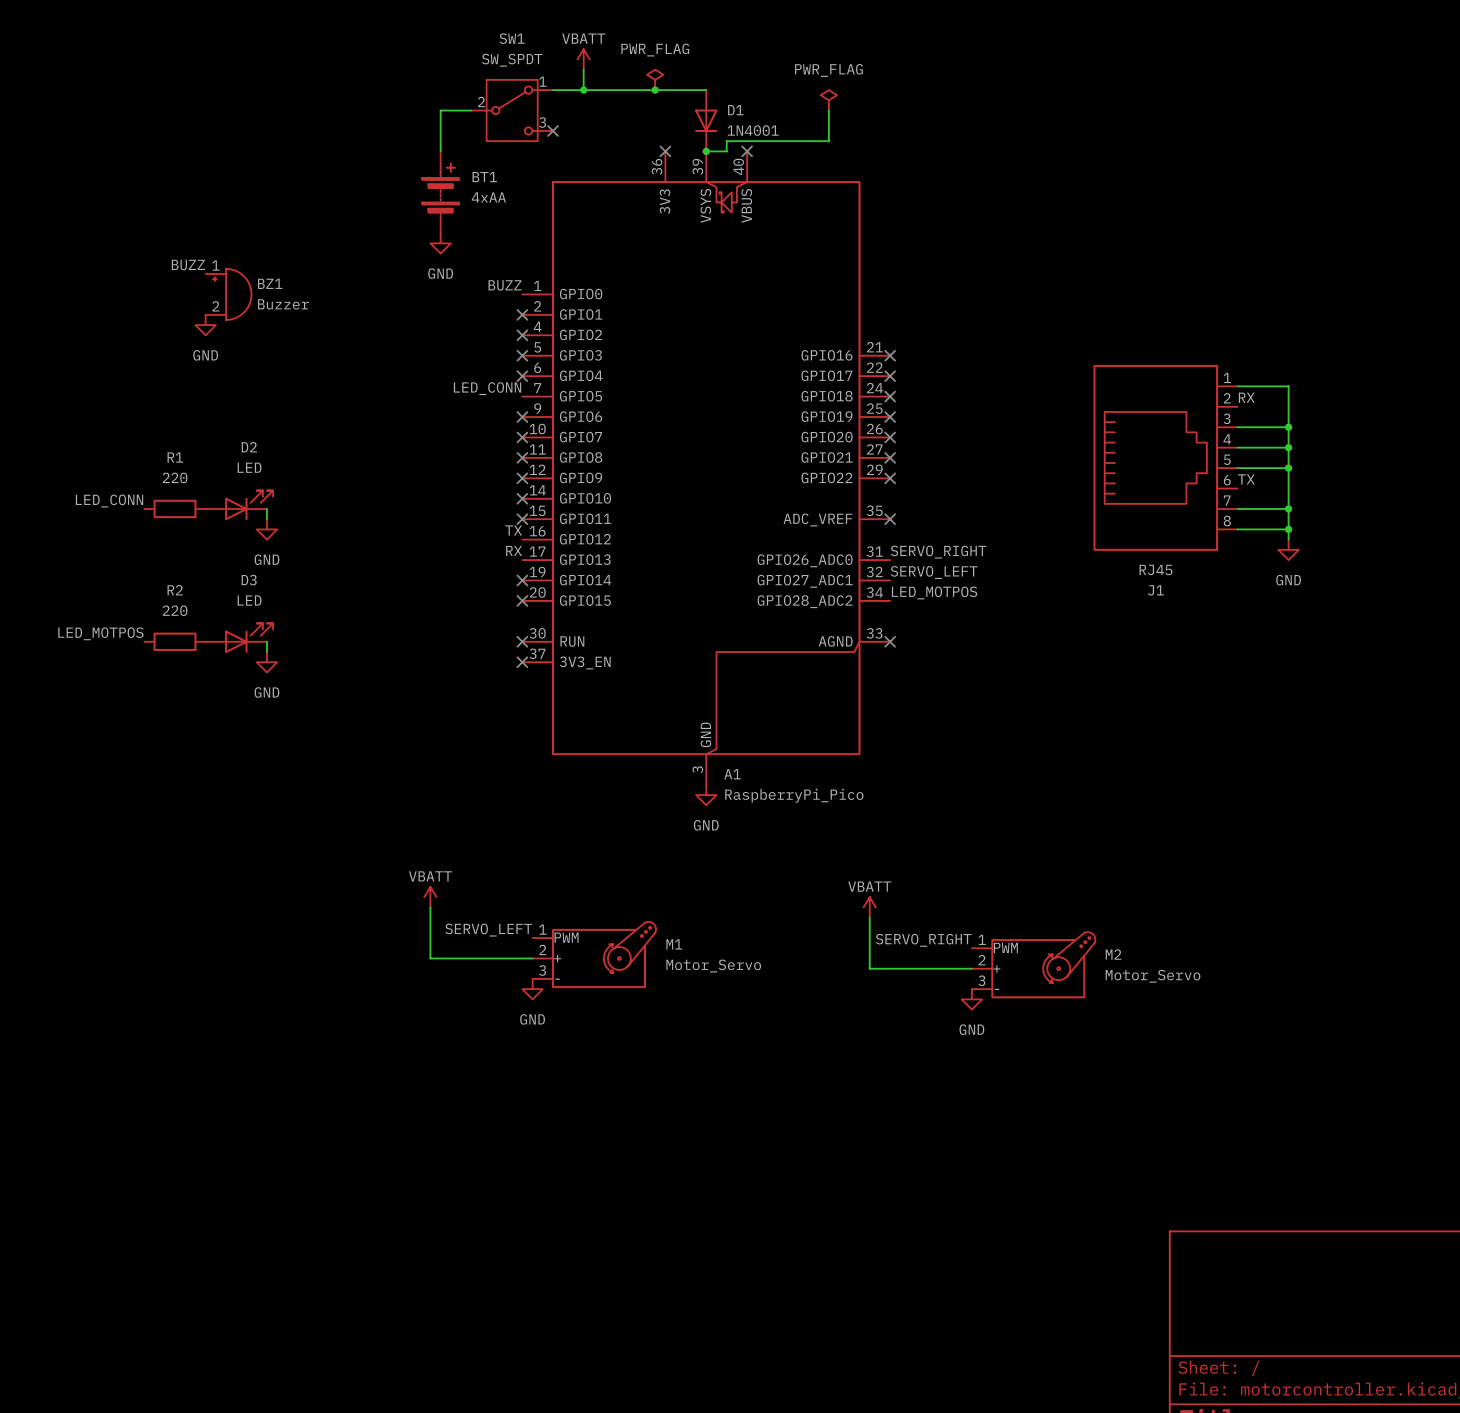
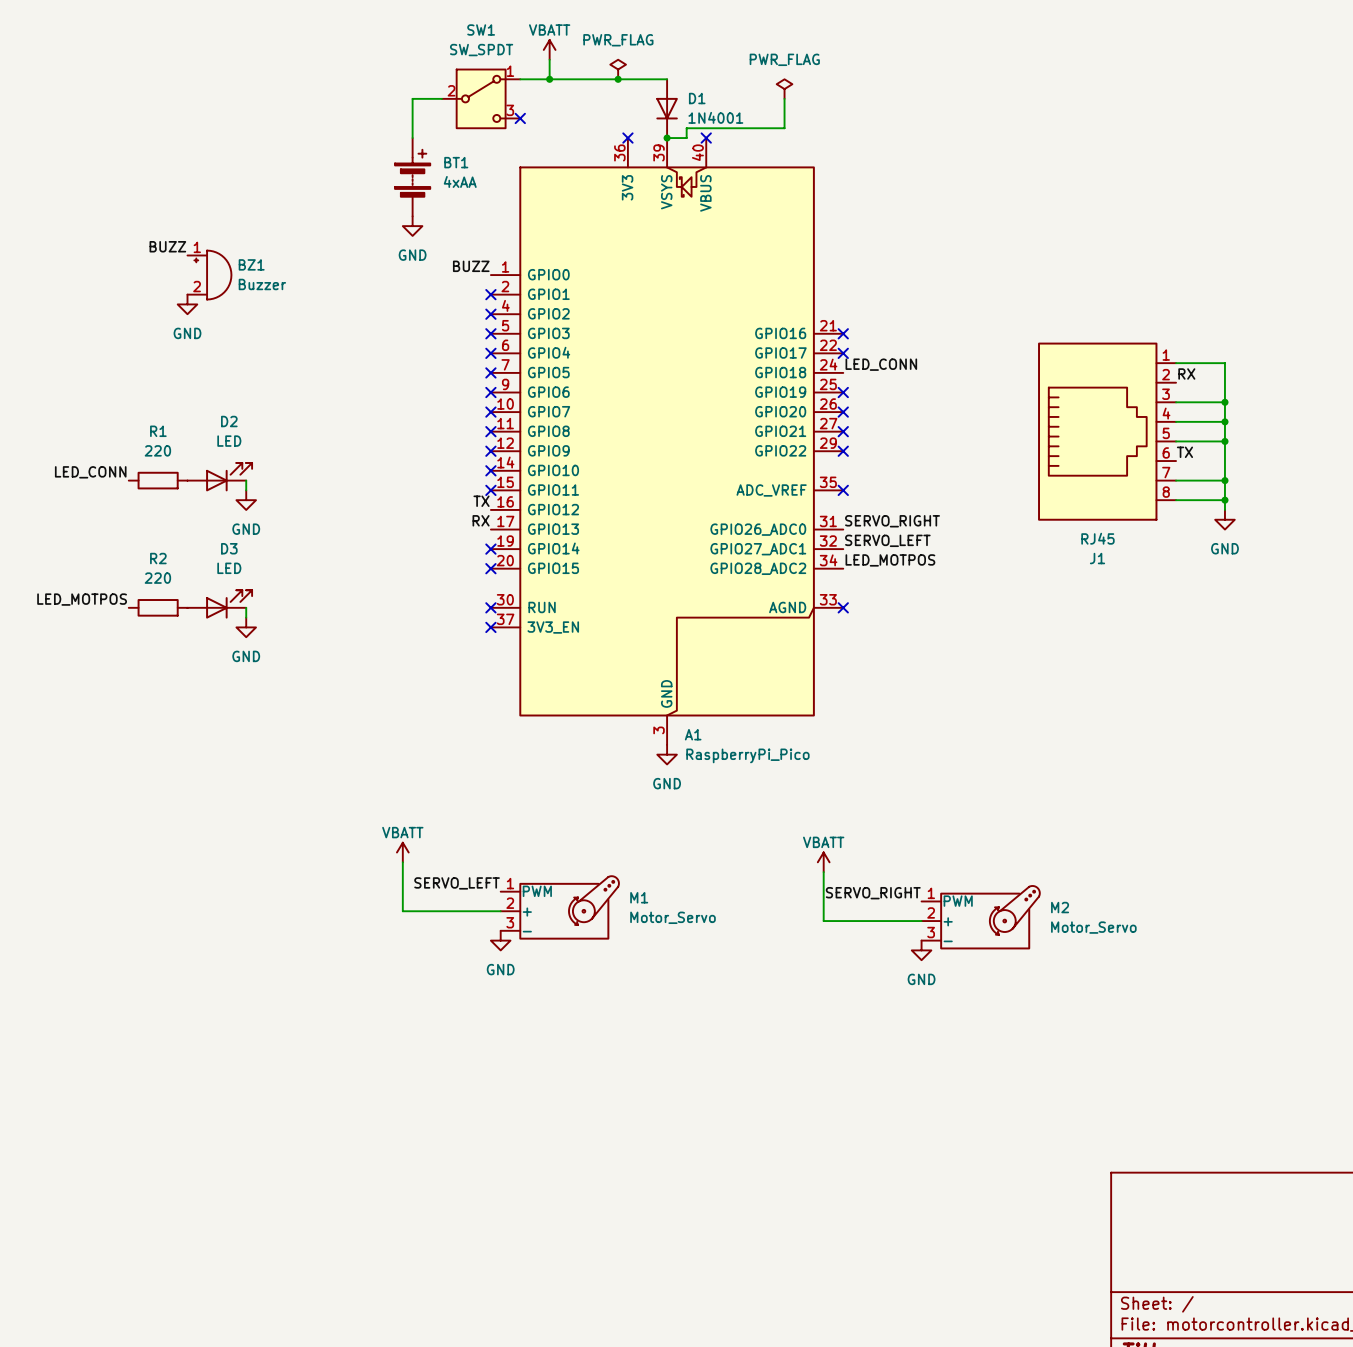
label: LED_CONN (487, 388) -> none
label: none -> LED_CONN (881, 364)
no-connect mark: none -> (490, 372)
no-connect mark: (890, 396) -> none

